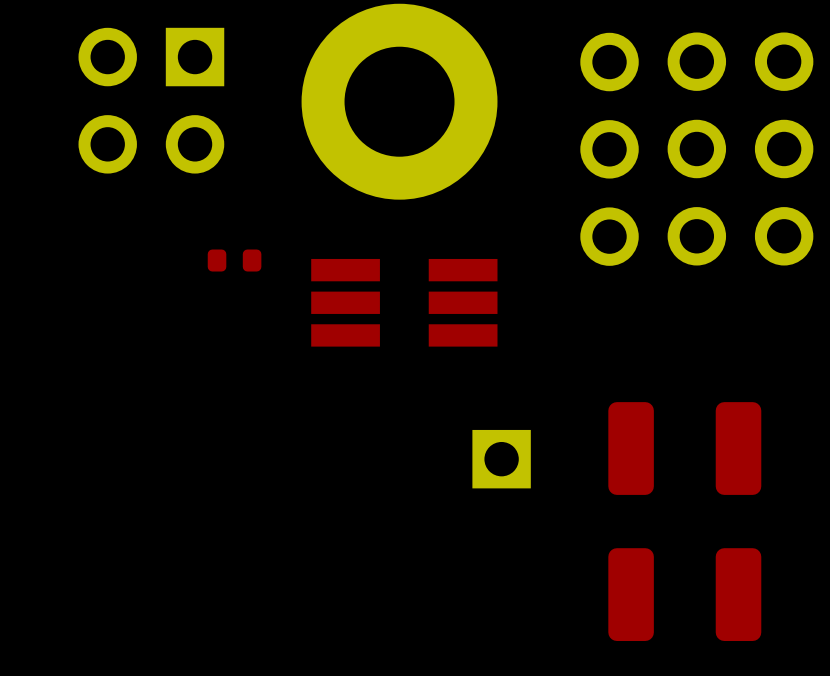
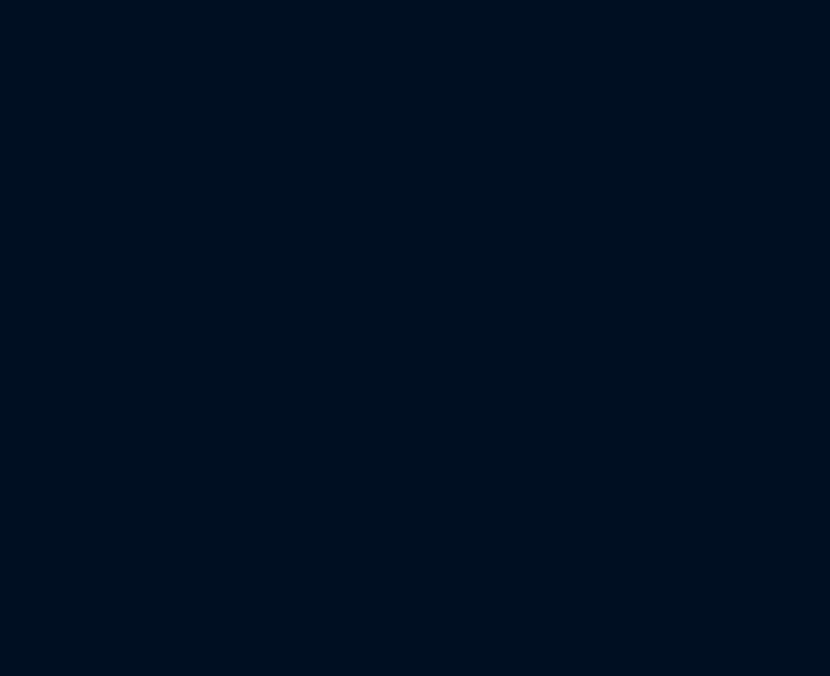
part: (151, 100) -> none
part: (399, 101) -> none
part: (696, 149) -> none
part: (234, 260) -> none
part: (404, 302) -> none
part: (684, 448) -> none
part: (501, 459) -> none
part: (684, 594) -> none

